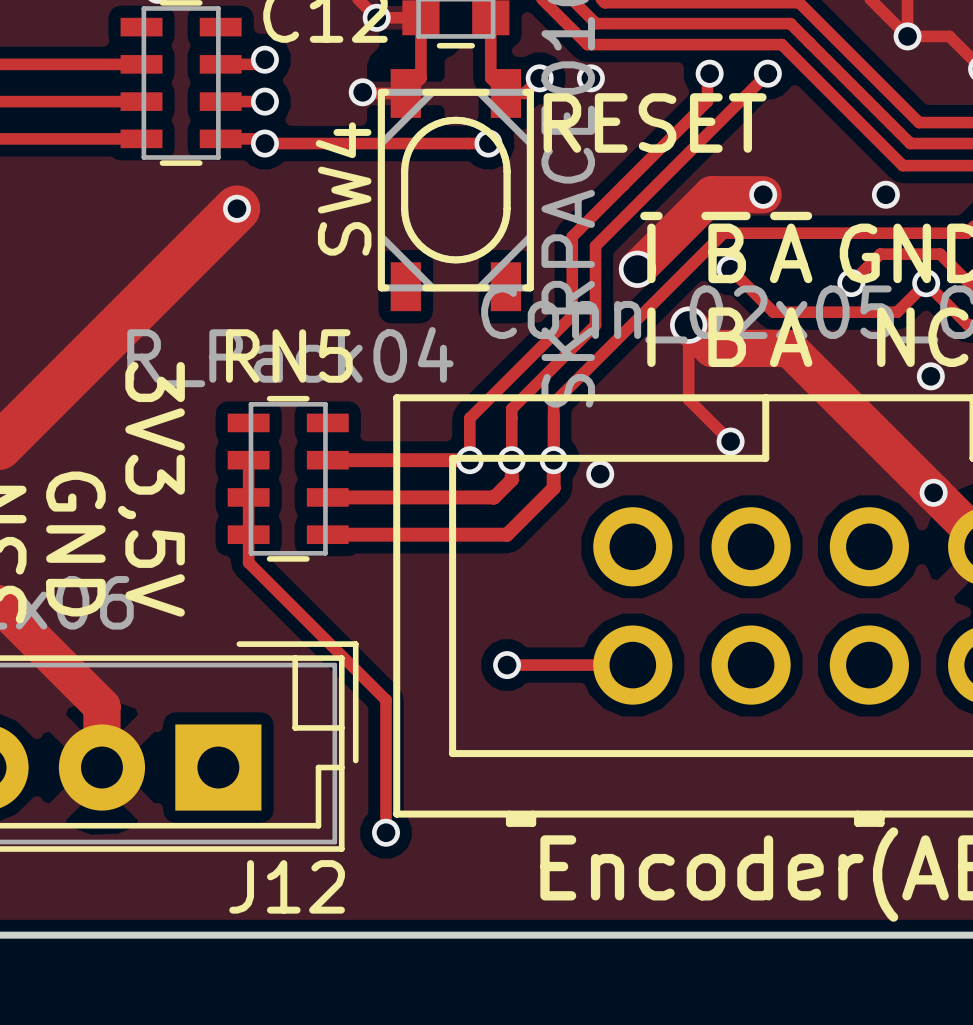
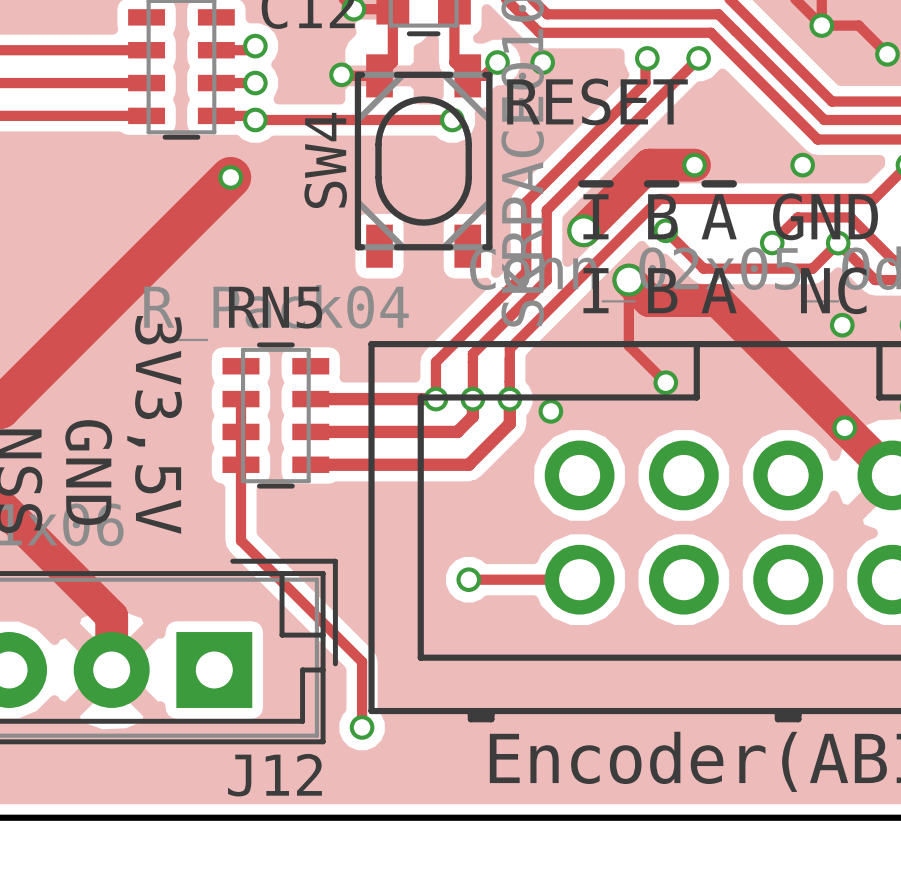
track: (248, 562) (386, 700) (386, 758) -> (240, 489) (240, 540) (362, 661)

